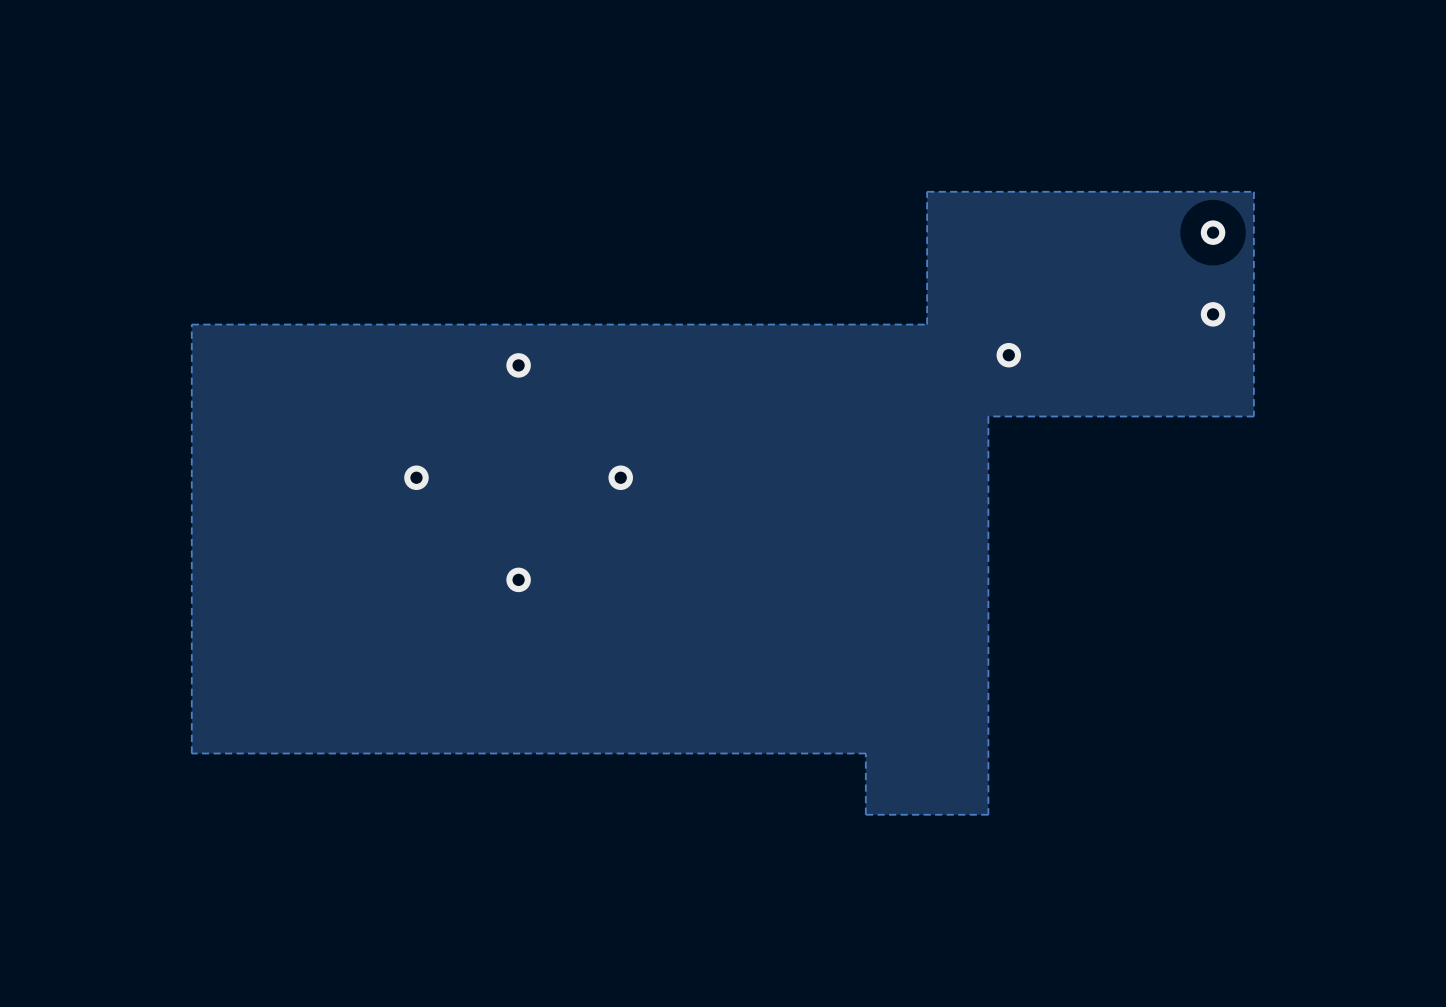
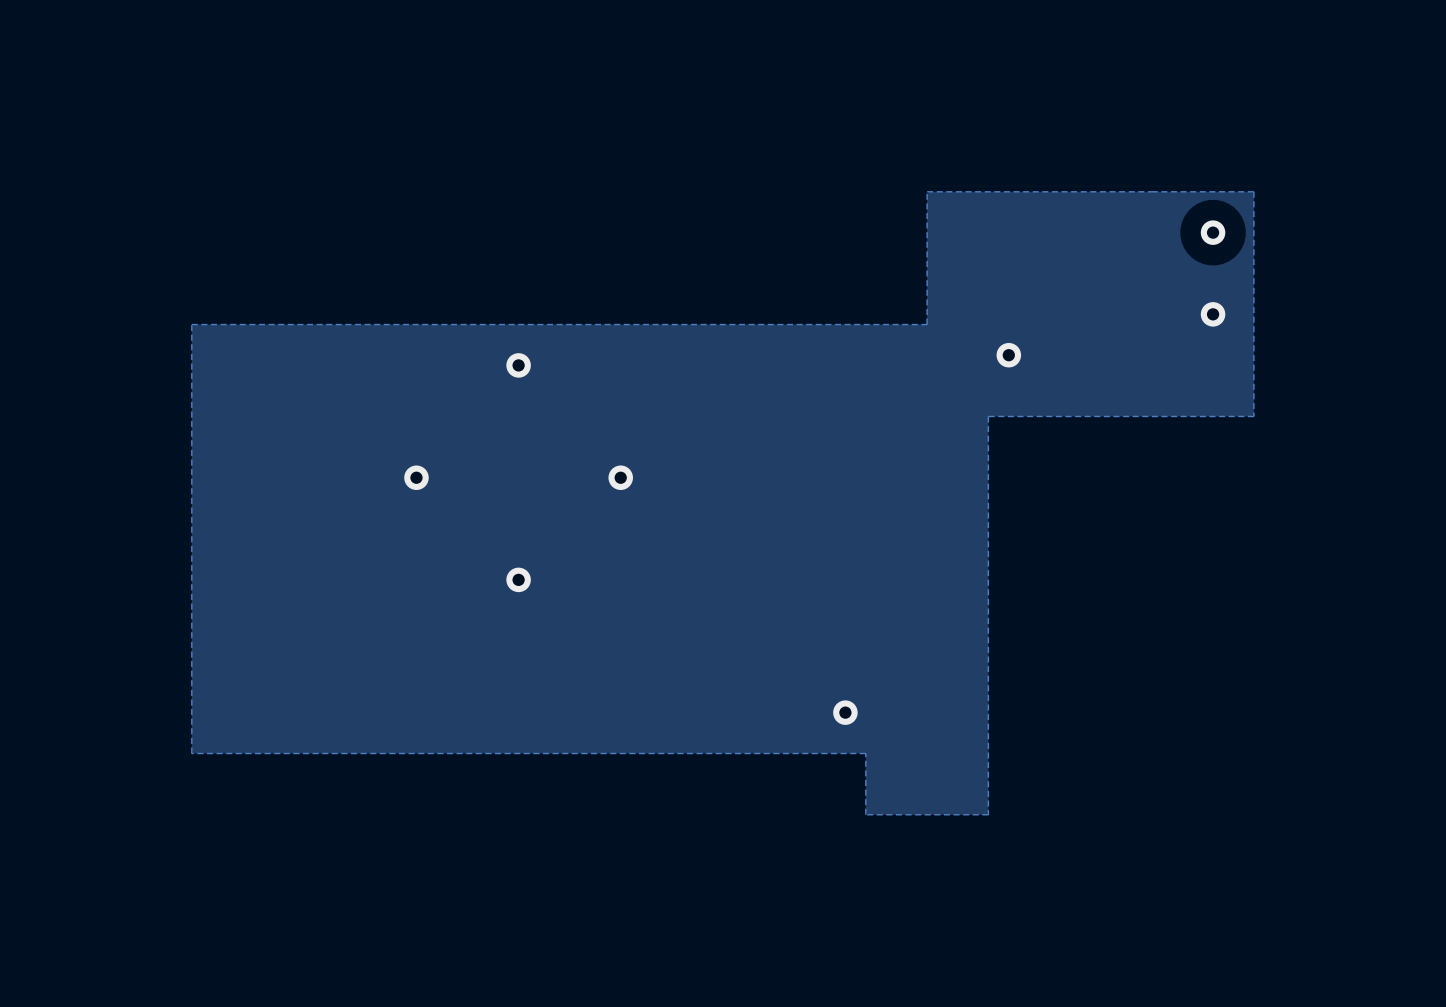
via: none -> (845, 712)

